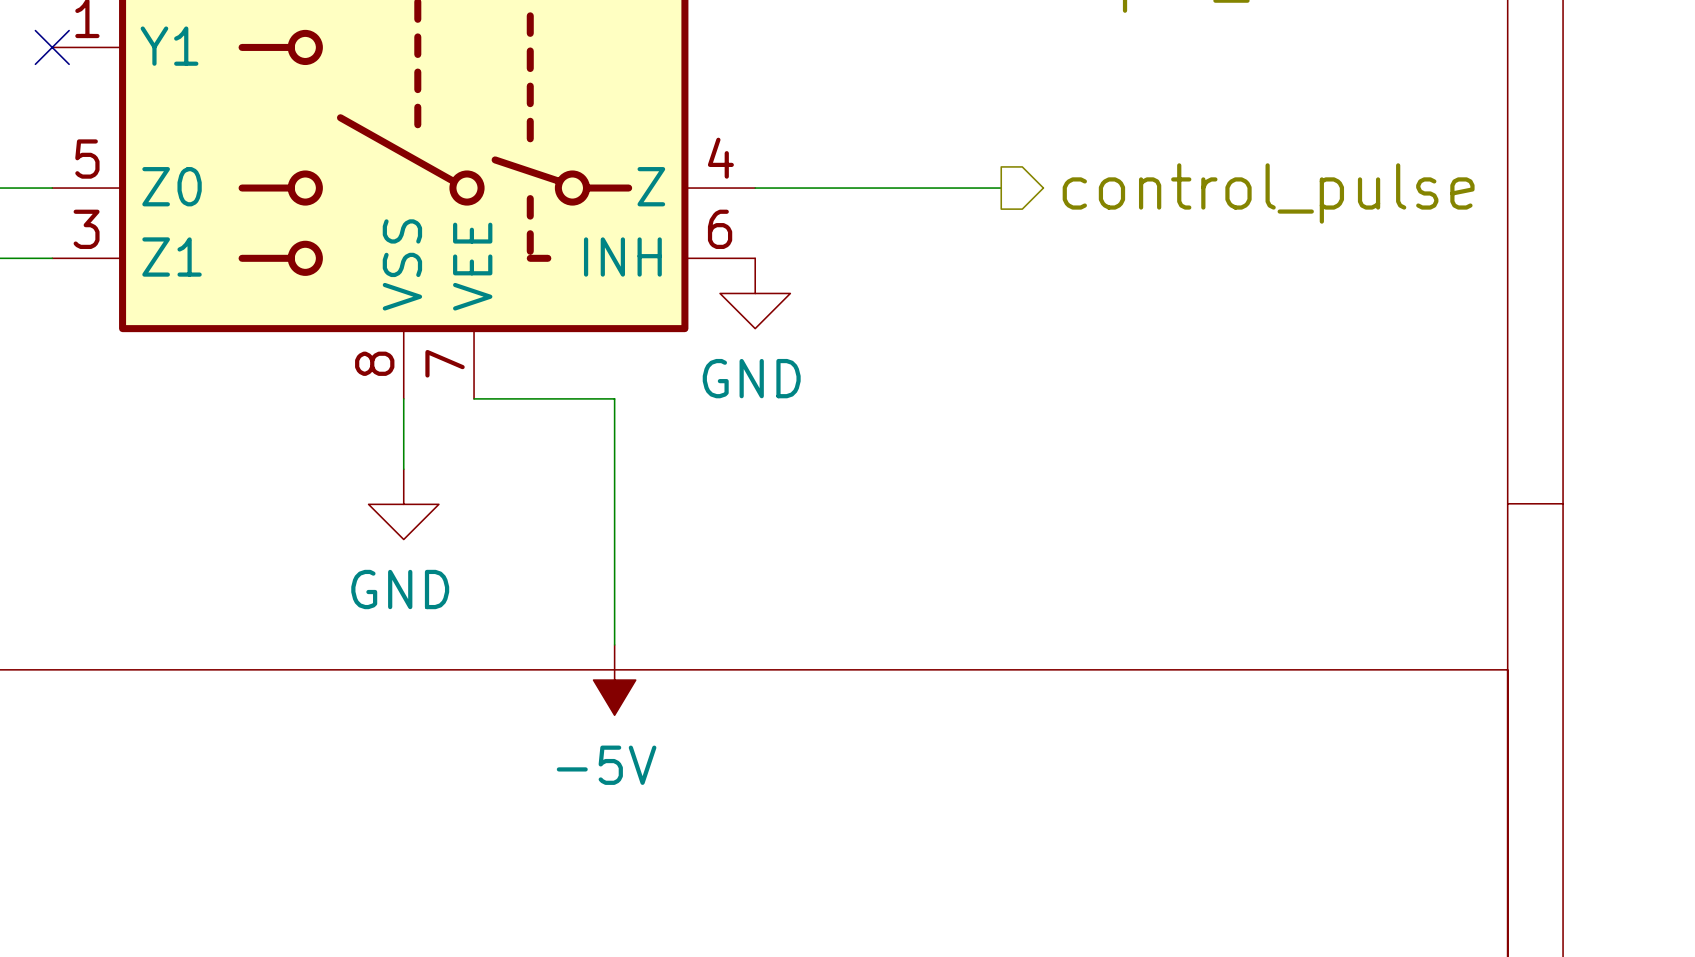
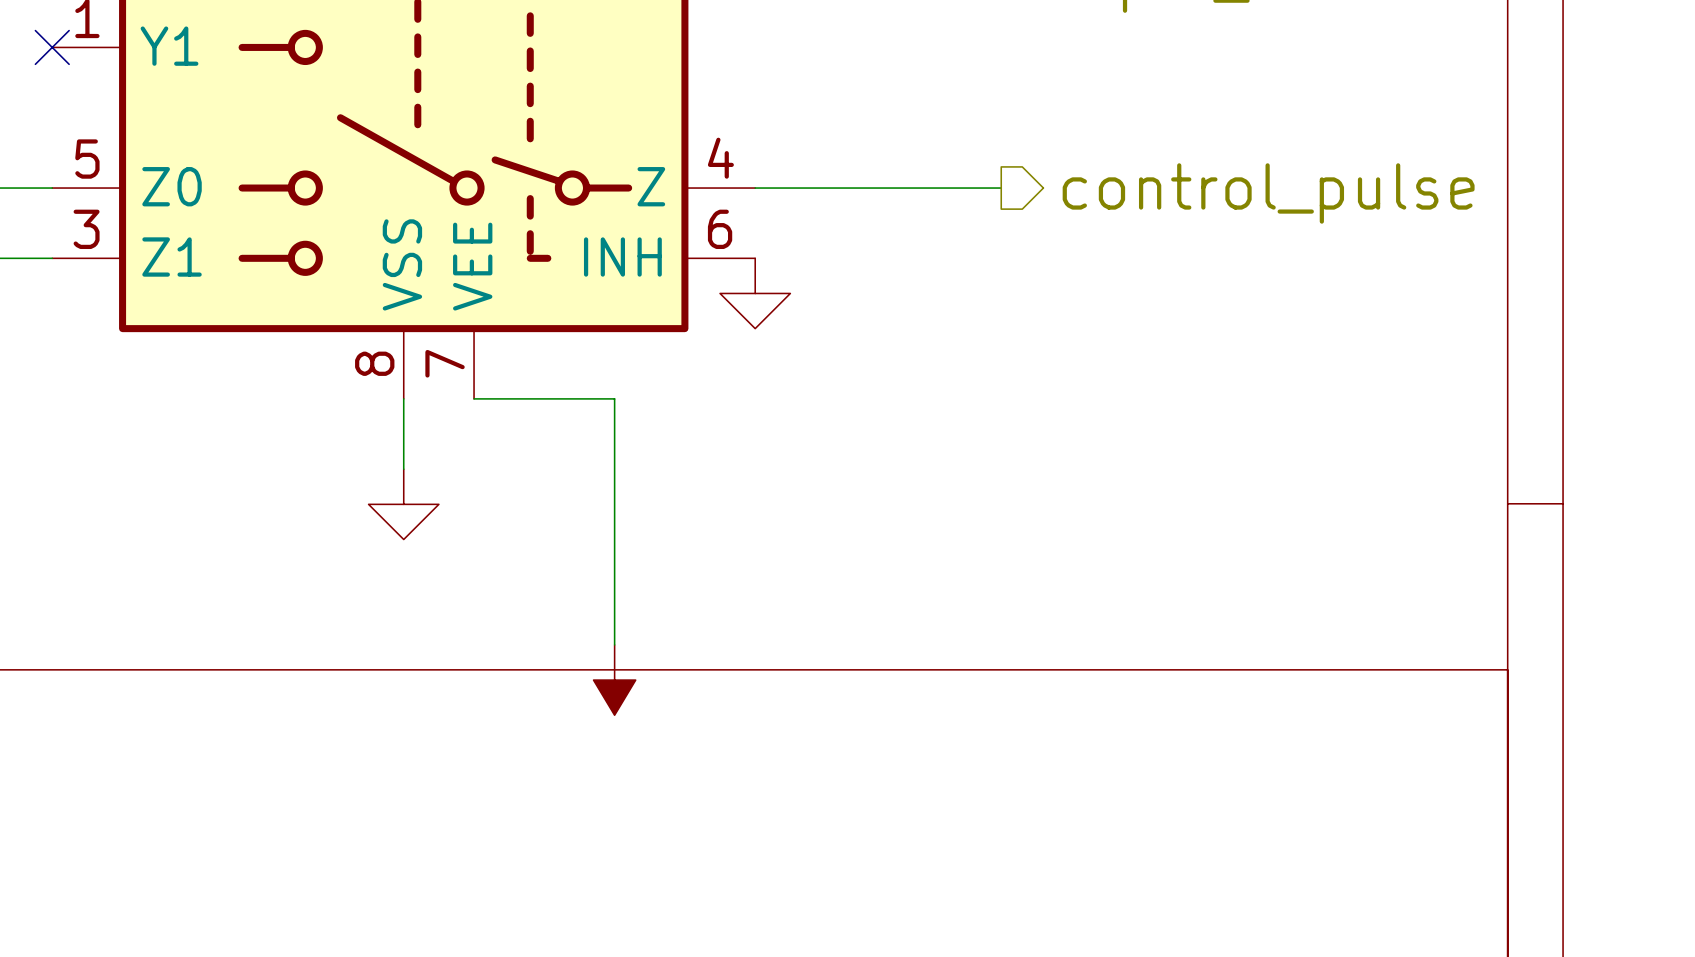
power symbol text: GND (751, 378) -> none
power symbol text: GND (400, 589) -> none
power symbol text: -5V (606, 765) -> none

